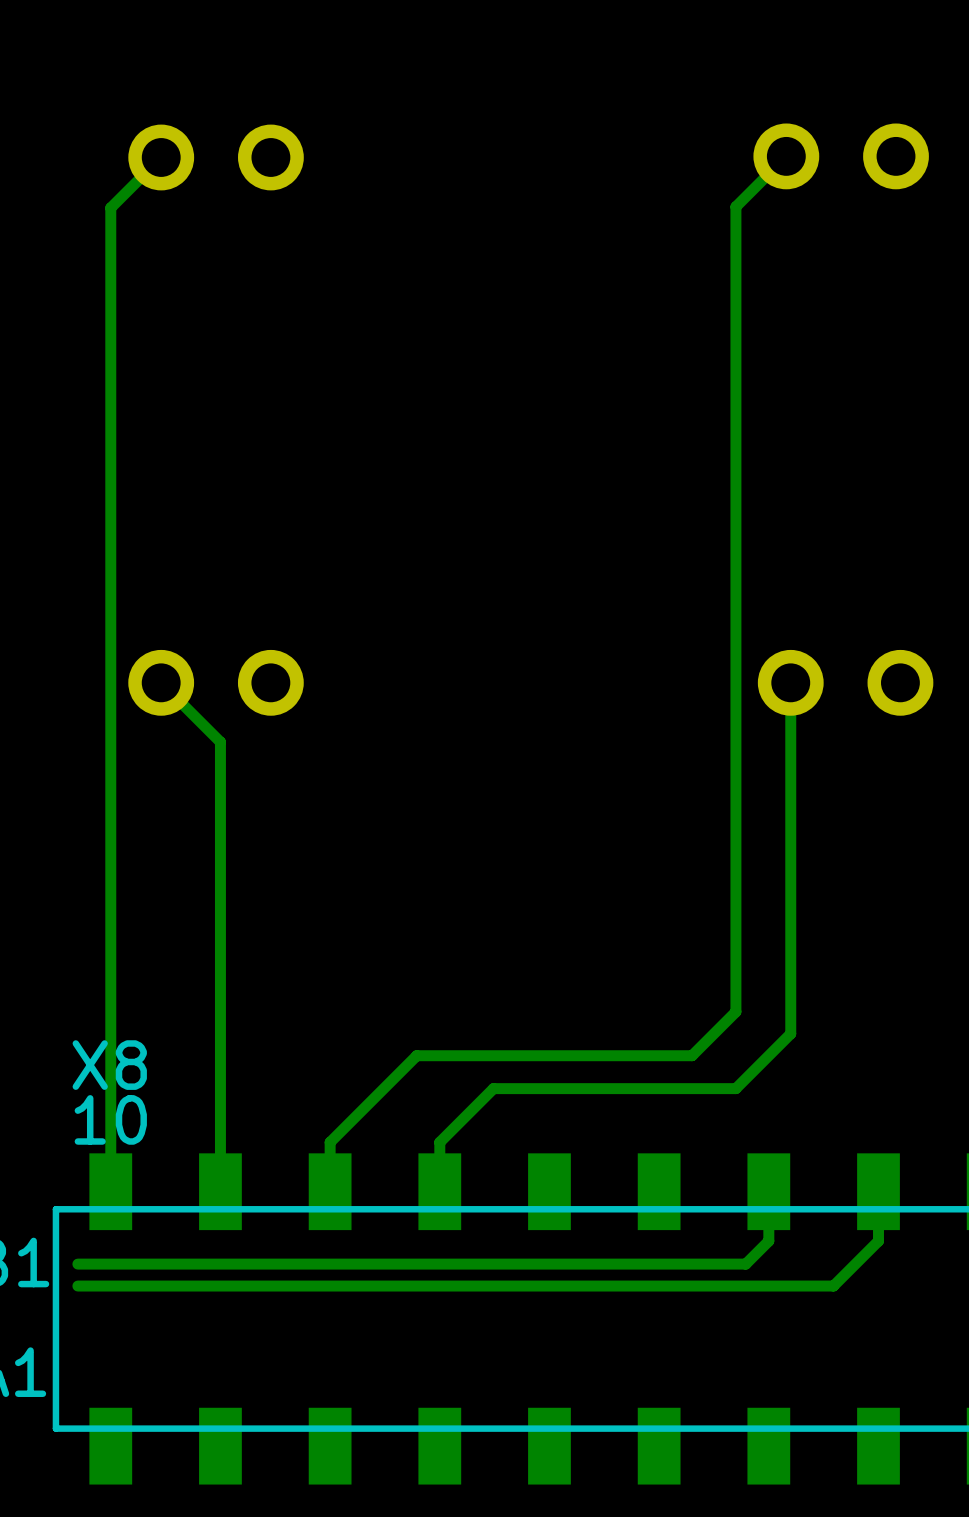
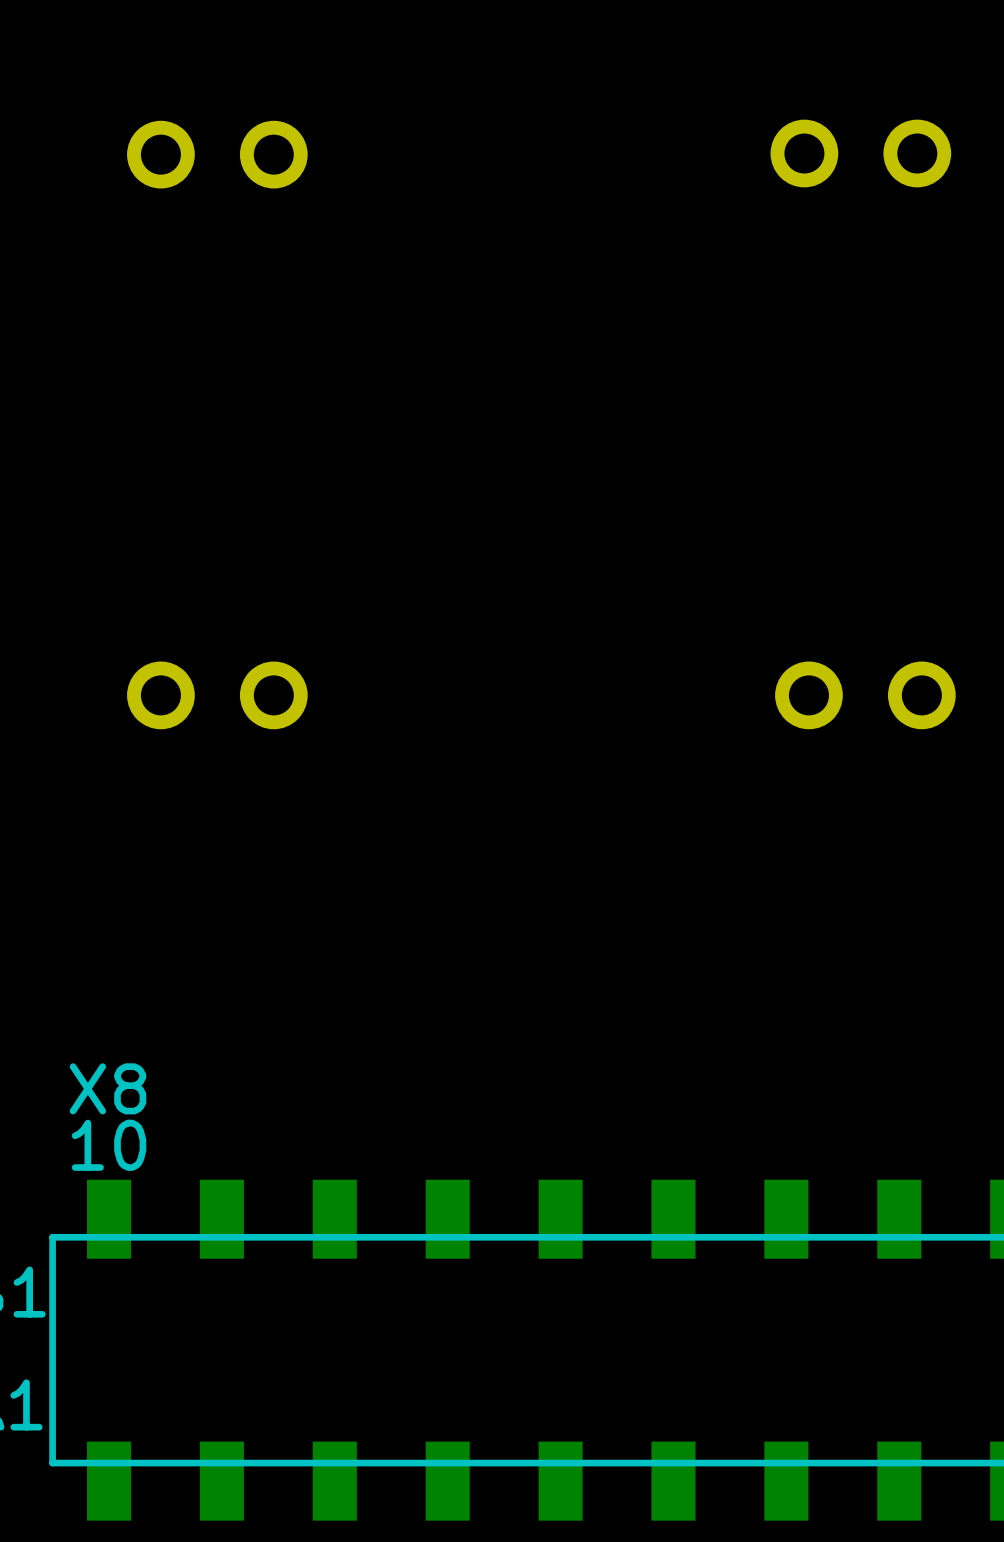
track: (786, 156) (735, 206) (735, 1011) (692, 1055) (416, 1055) (330, 1142) (330, 1191) -> none
track: (161, 157) (110, 207) (110, 1191) -> none
track: (161, 682) (220, 742) (220, 1191) -> none
track: (790, 682) (790, 1033) (735, 1088) (493, 1088) (439, 1142) (439, 1191) -> none
track: (768, 1191) (768, 1241) (745, 1264) (77, 1264) -> none
track: (878, 1191) (878, 1241) (833, 1286) (77, 1286) -> none

